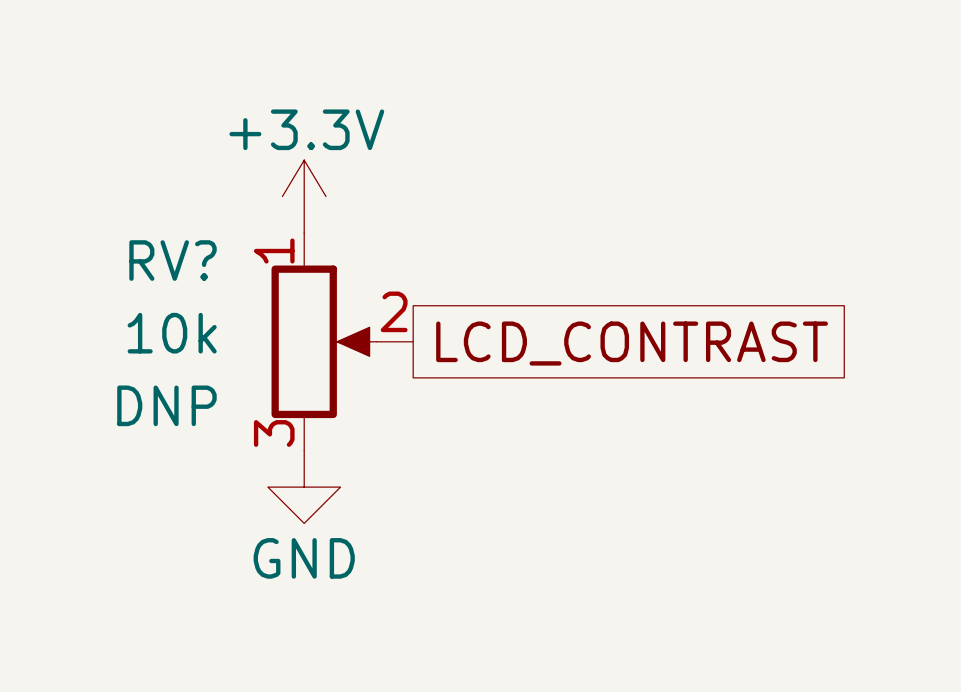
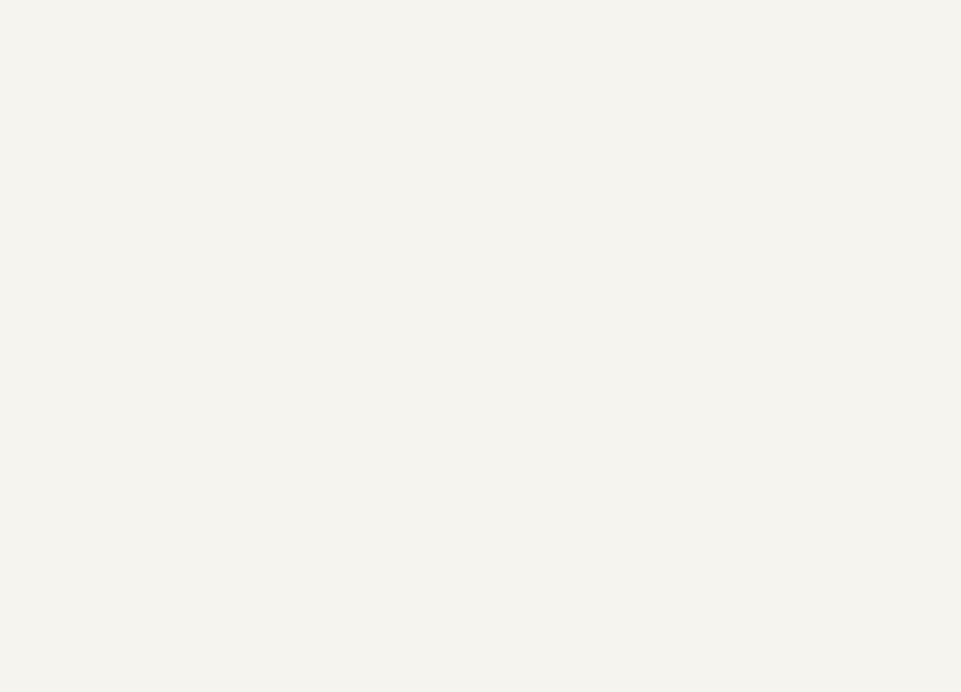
power symbol: +3.3V (304, 196) -> none
RV?: 10k (342, 341) -> none
global label: LCD_CONTRAST (632, 343) -> none
power symbol: GND (304, 487) -> none

